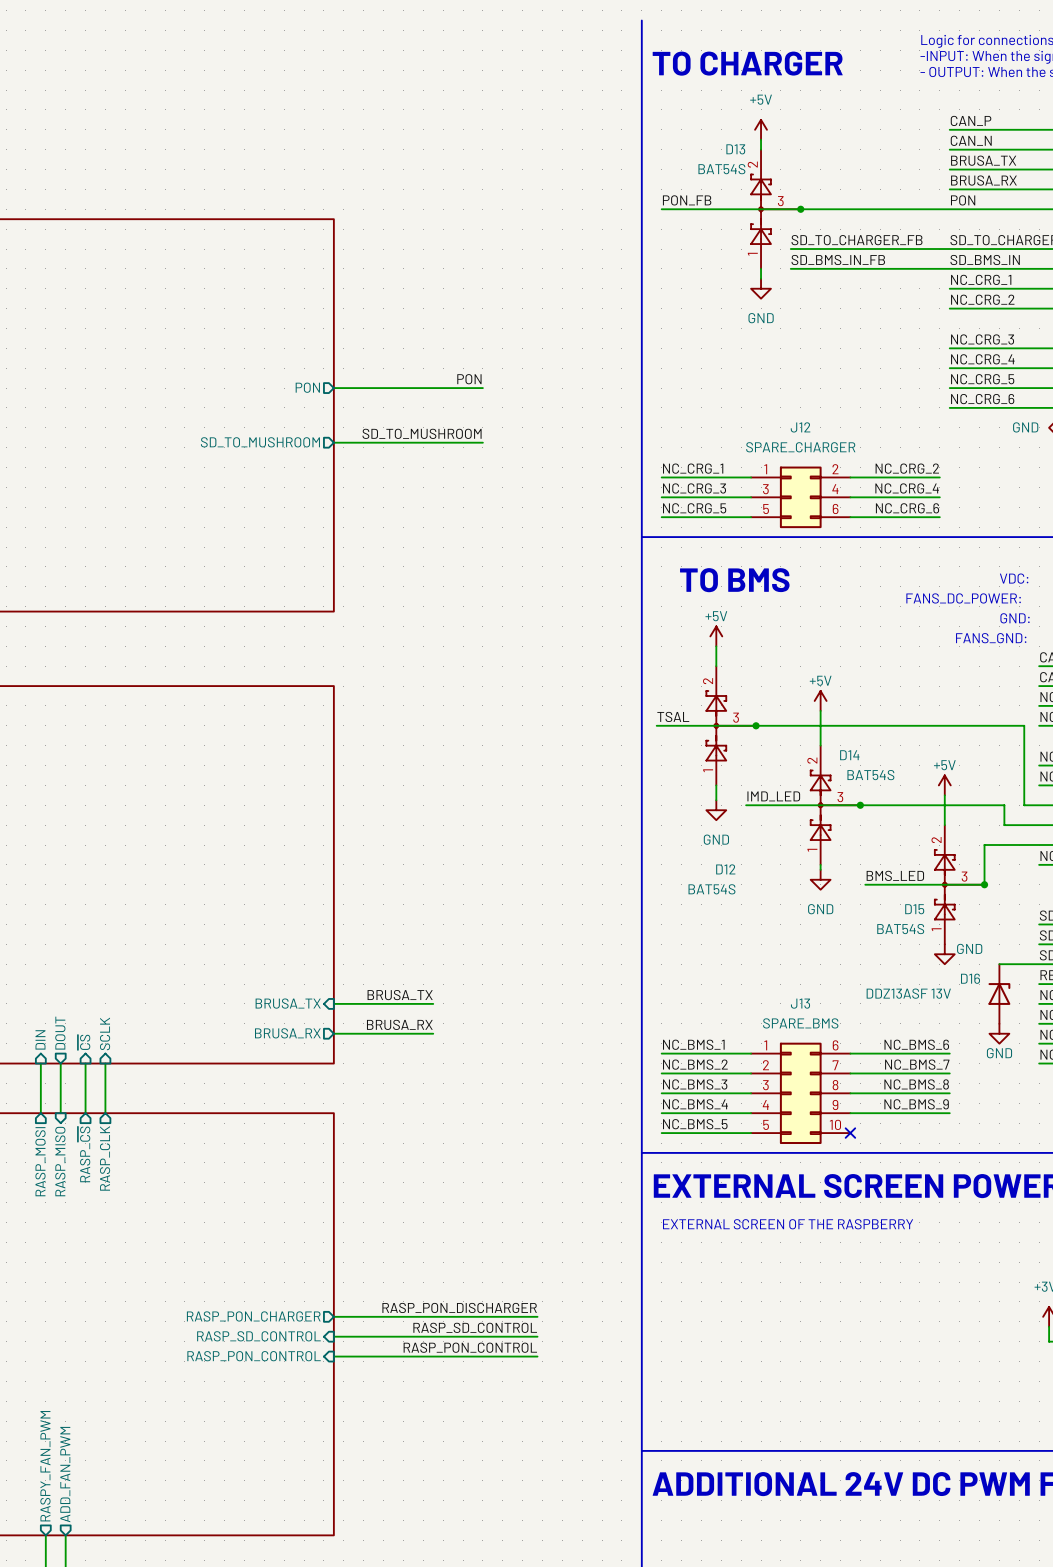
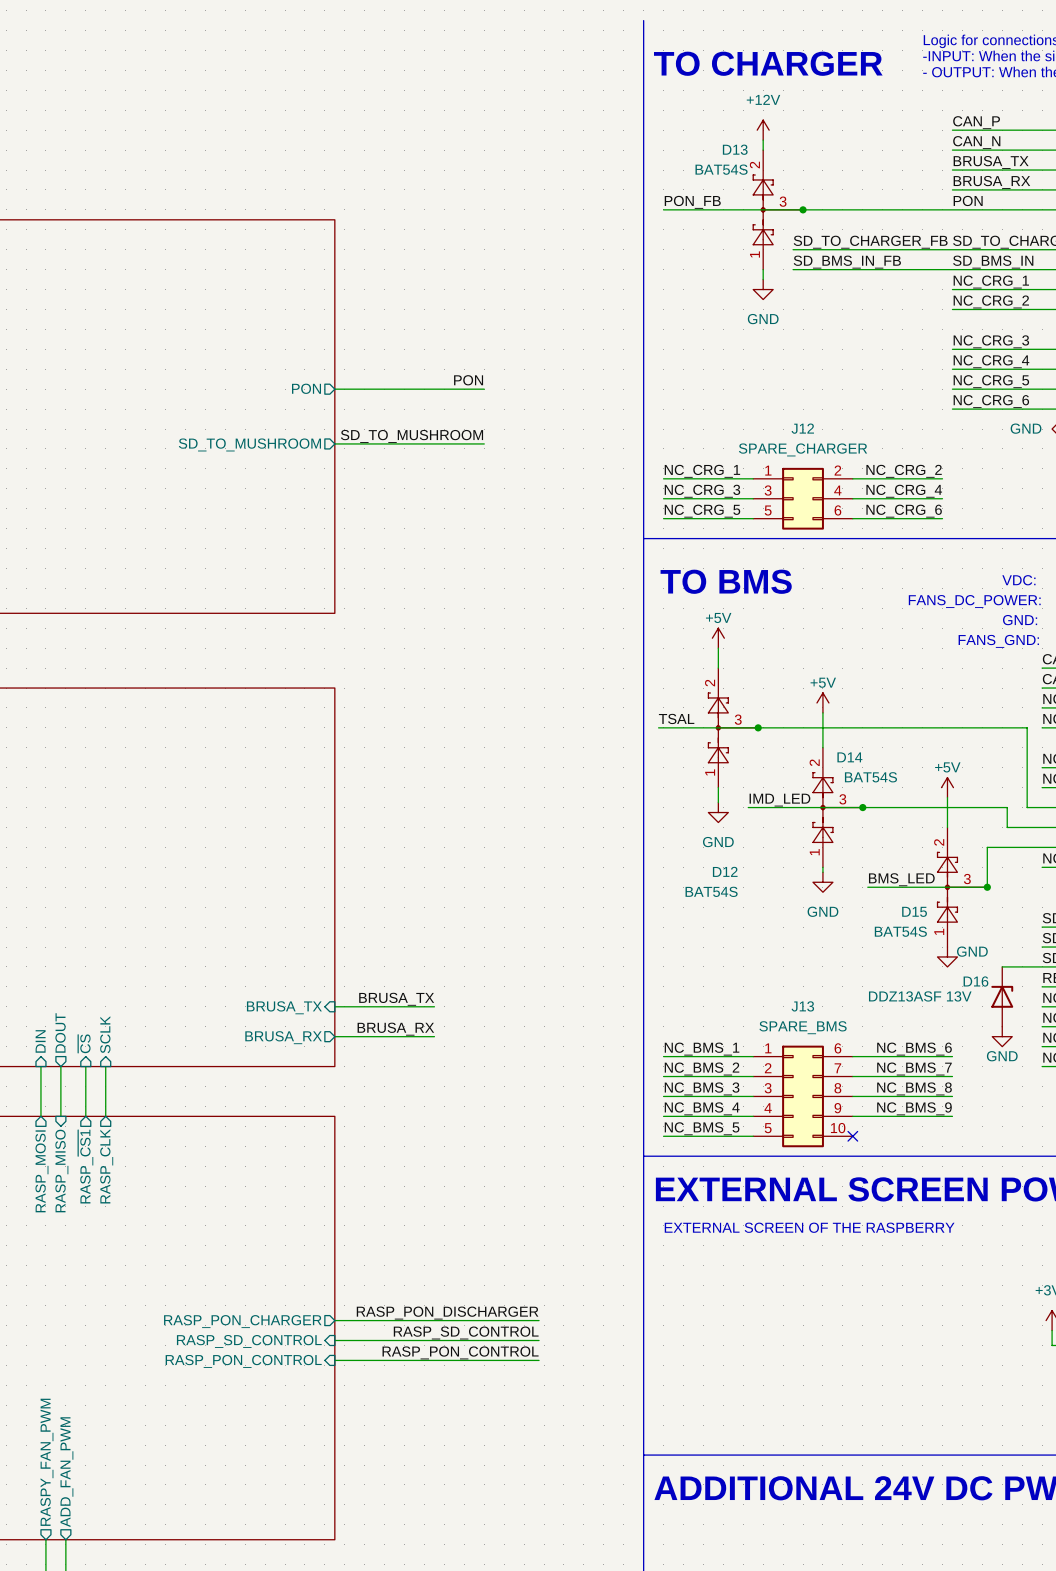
power symbol: +5V (761, 129) -> +12V (763, 130)
sheet pin: RASP_~{CS} (84, 1154) -> RASP_~{CS1} (85, 1166)

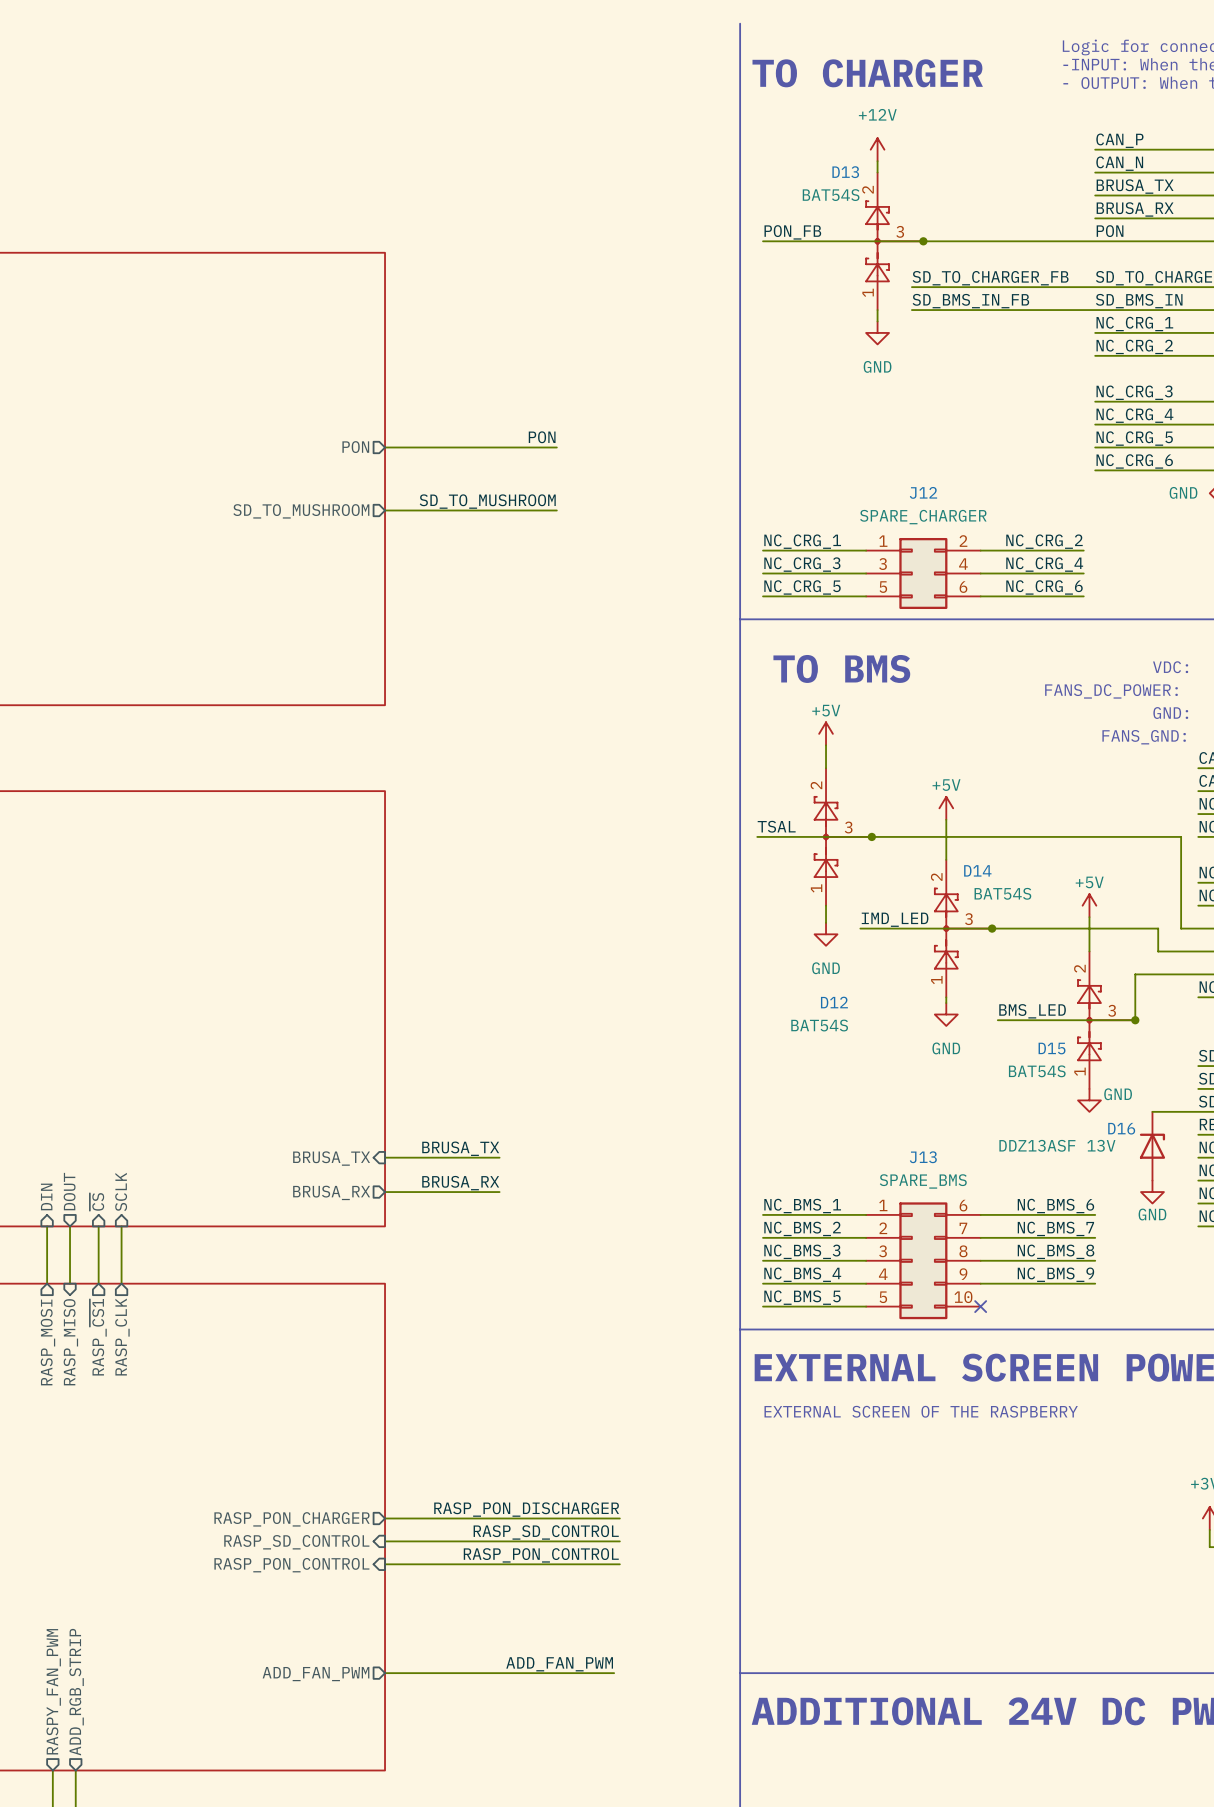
label: none -> ADD_FAN_PWM (559, 1664)
wire: none -> (385, 1673) (614, 1673)
sheet pin: none -> ADD_FAN_PWM (316, 1674)
sheet pin: ADD_FAN_PWM (66, 1472) -> ADD_RGB_STRIP (76, 1692)

